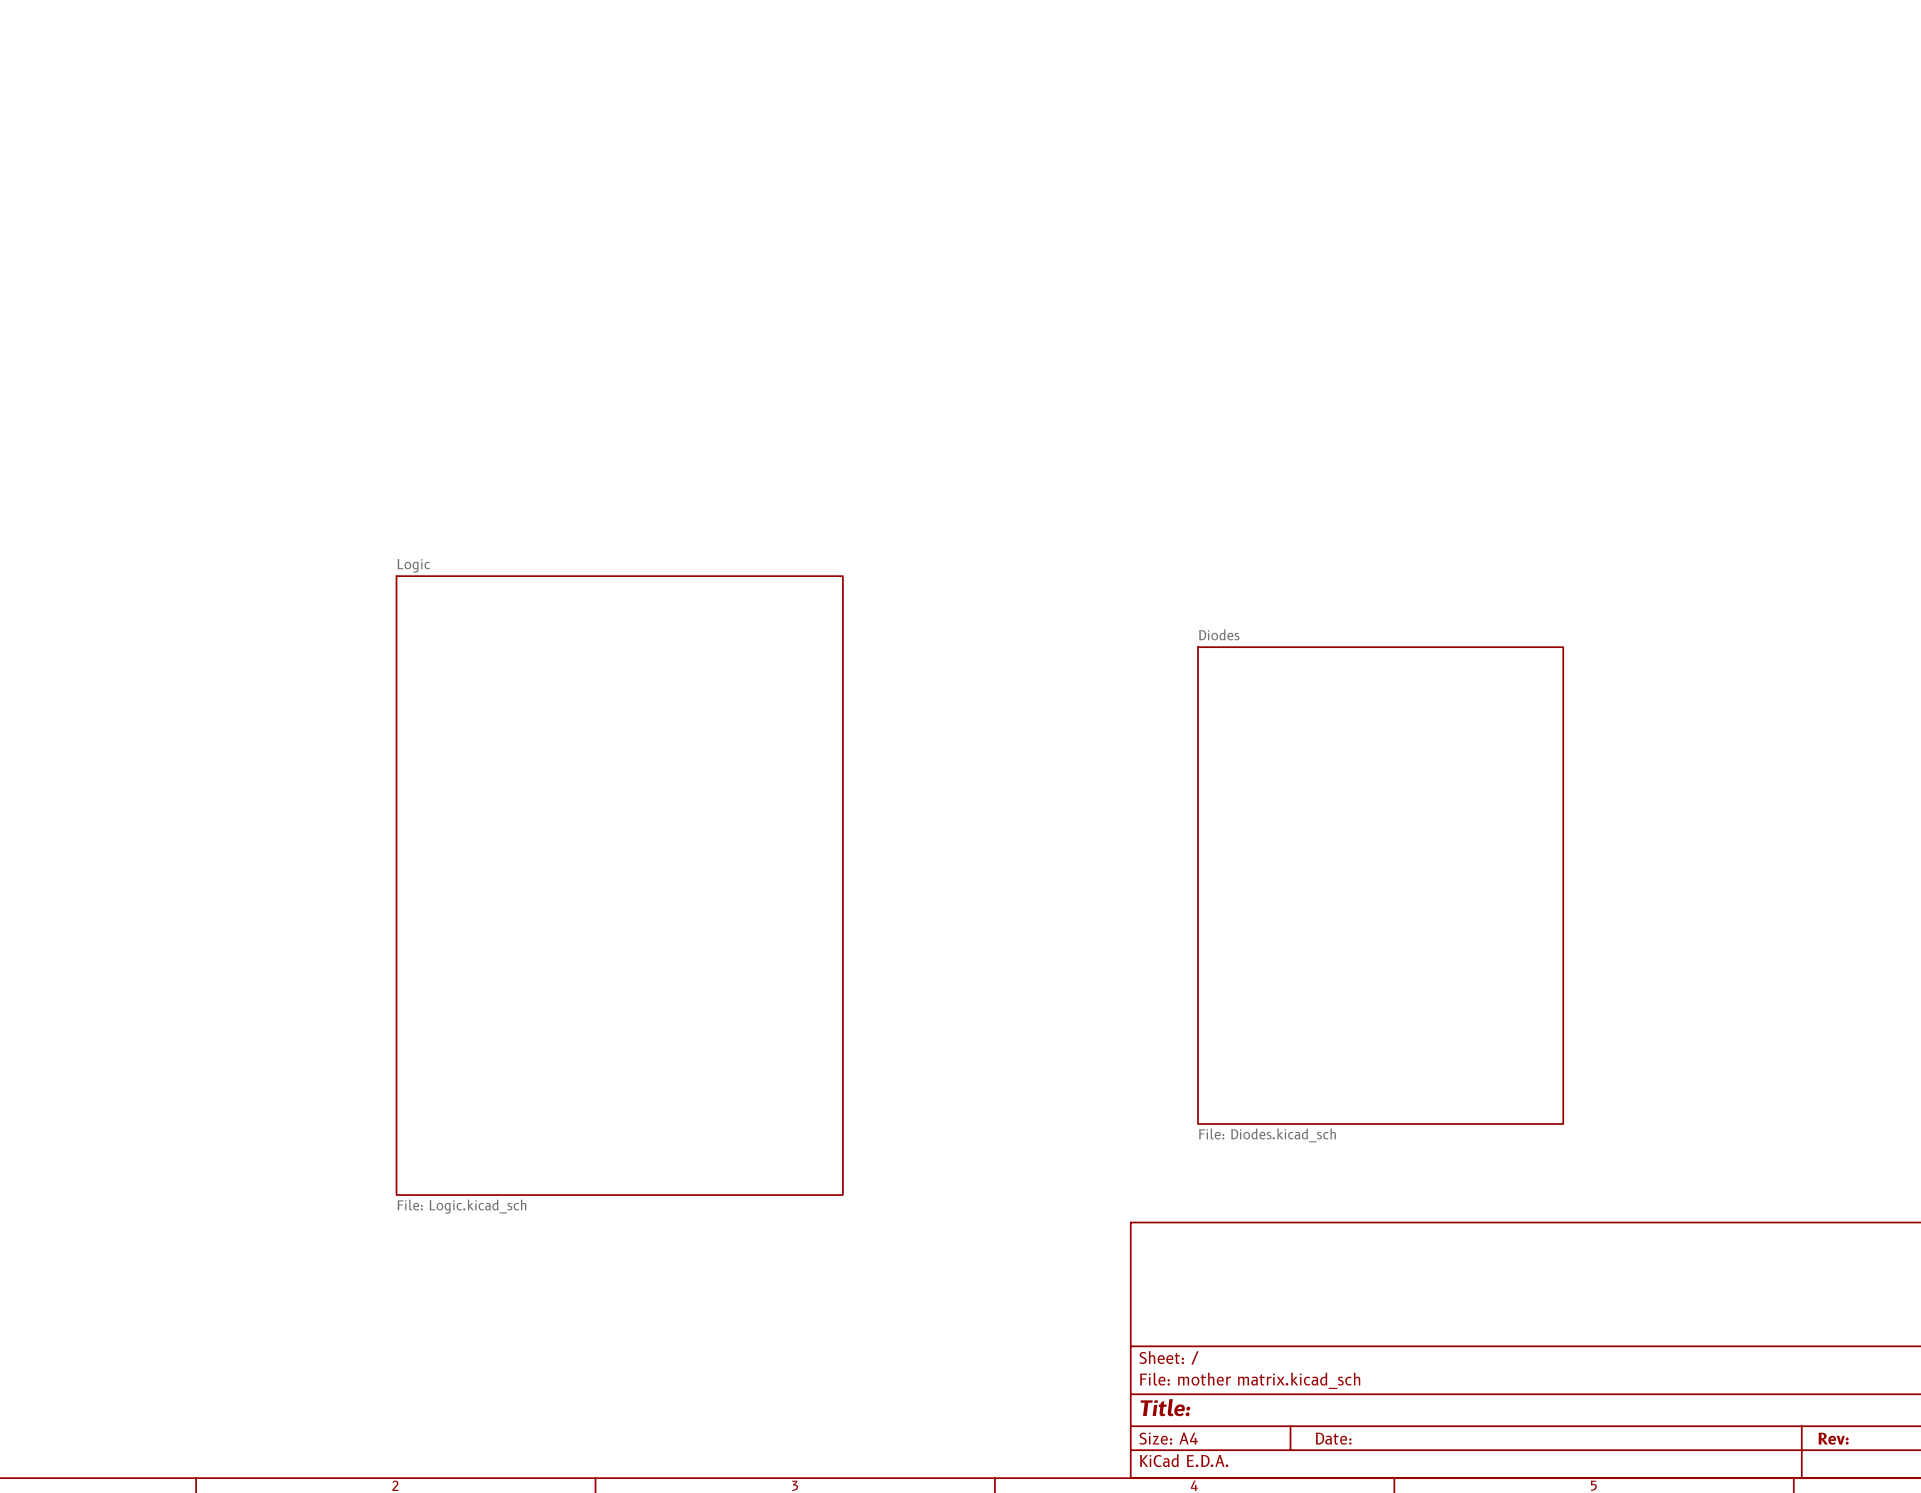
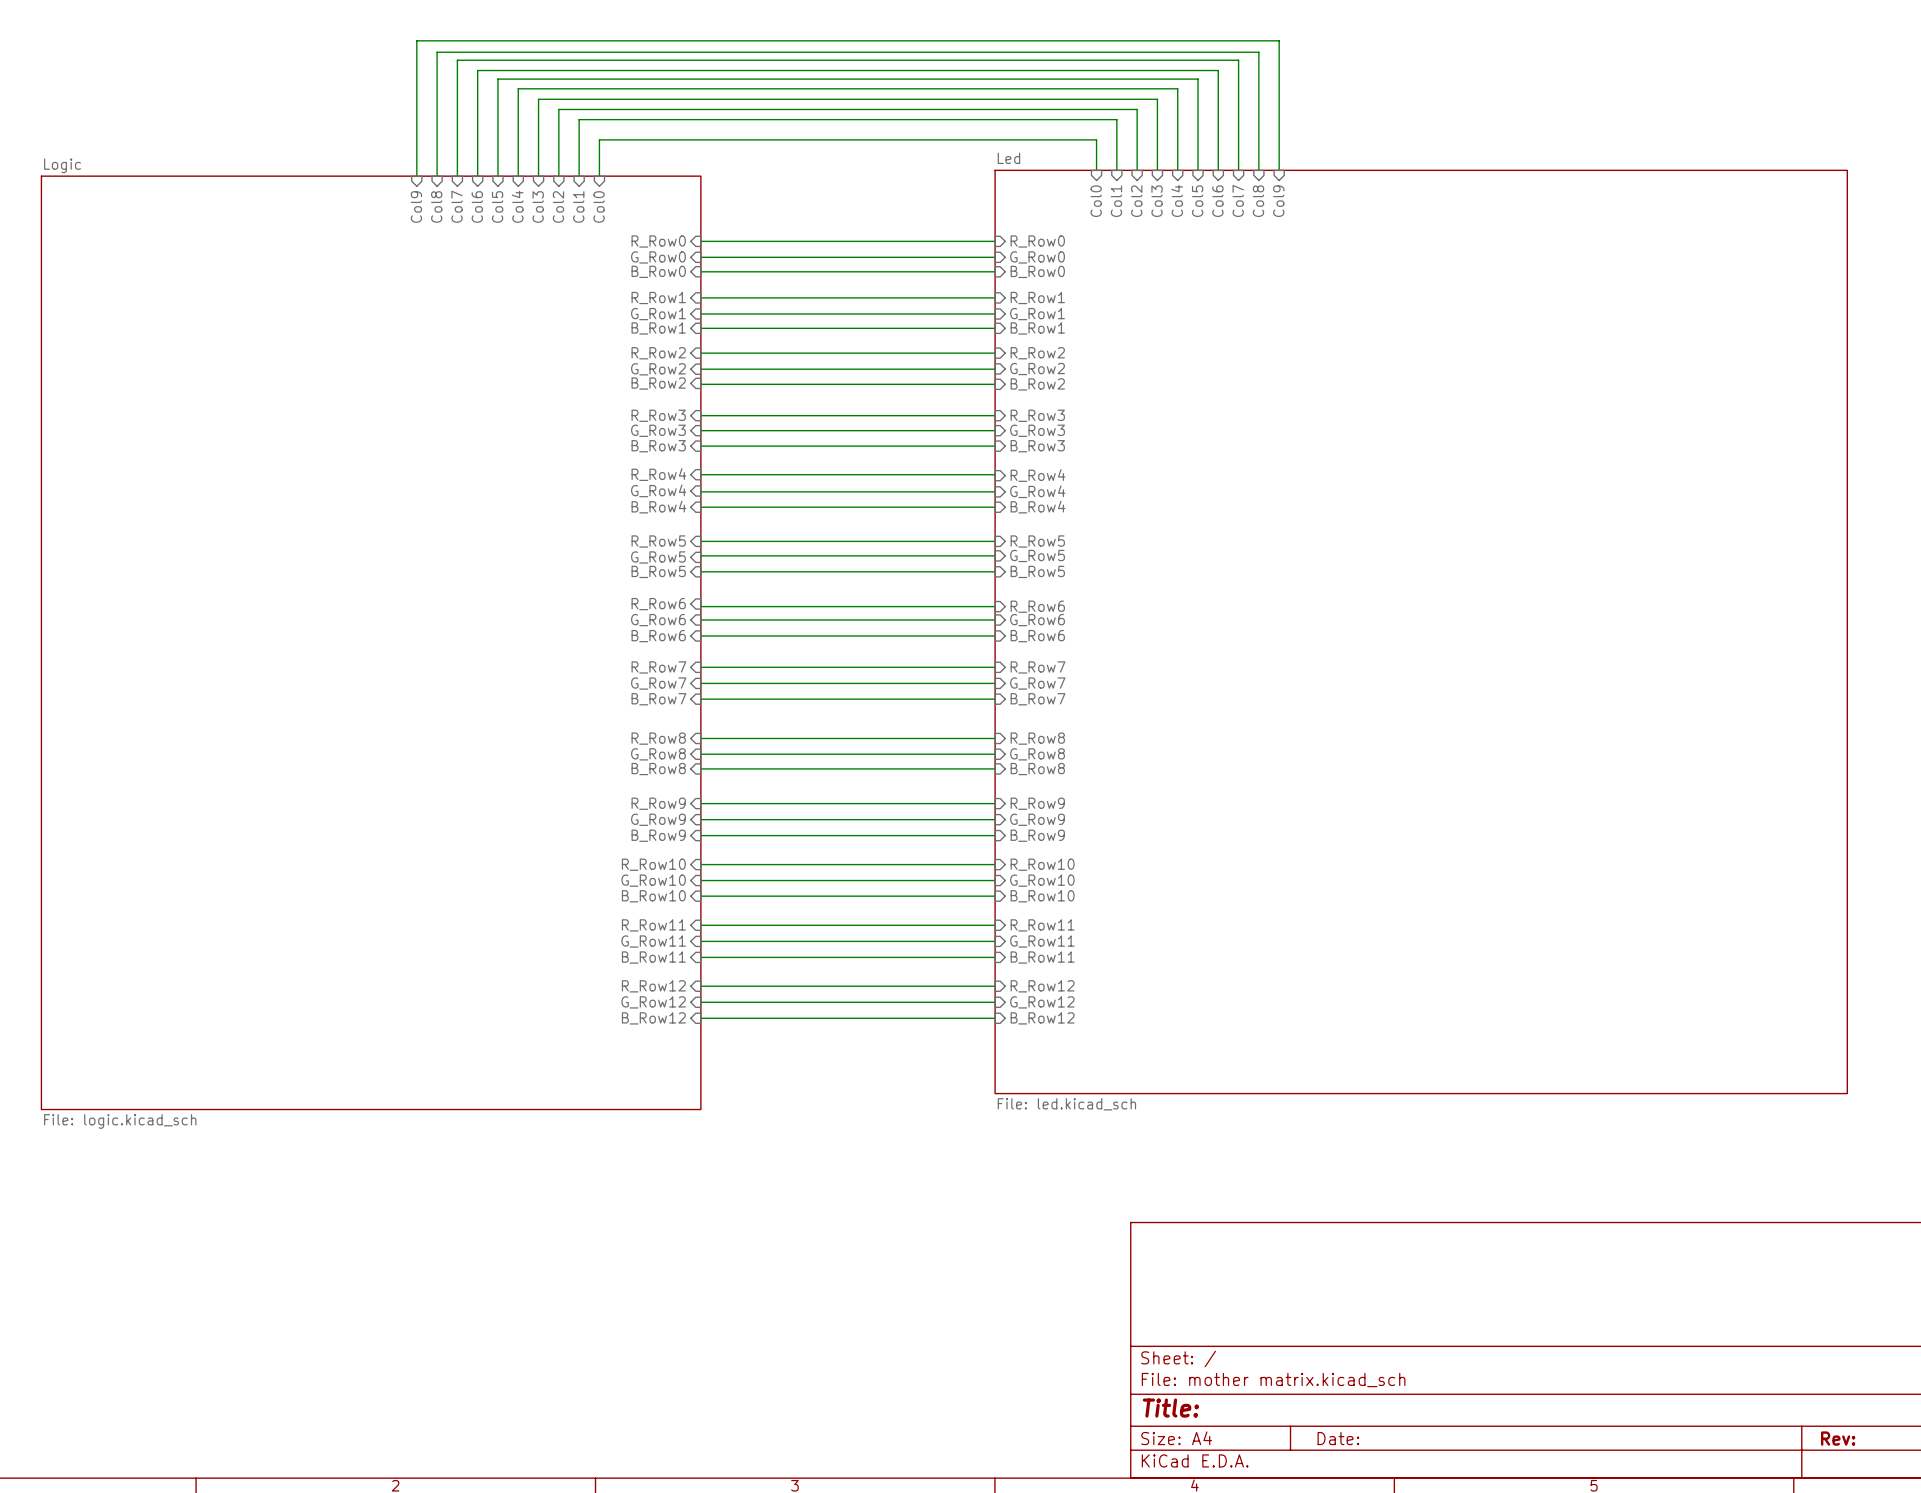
wire: none -> (1096, 170) (1096, 139) (599, 139) (599, 176)
wire: none -> (1116, 170) (1116, 119) (579, 119) (579, 176)
wire: none -> (1137, 170) (1137, 109) (558, 109) (558, 176)
wire: none -> (1157, 170) (1157, 99) (538, 99) (538, 176)
wire: none -> (1177, 170) (1177, 88) (518, 88) (518, 176)
wire: none -> (1198, 170) (1198, 79) (497, 79) (497, 176)
wire: none -> (1218, 170) (1218, 70) (477, 70) (477, 176)
wire: none -> (1238, 170) (1238, 60) (457, 60) (457, 176)
wire: none -> (1258, 170) (1258, 52) (437, 52) (437, 176)
wire: none -> (1279, 170) (1279, 40) (416, 40) (416, 176)
sheet pin: none -> Col0 (1096, 201)
sheet pin: none -> Col1 (1116, 201)
sheet pin: none -> Col2 (1136, 201)
sheet pin: none -> Col3 (1157, 201)
sheet pin: none -> Col4 (1177, 200)
sheet pin: none -> Col5 (1197, 201)
sheet pin: none -> Col6 (1217, 201)
sheet pin: none -> Col7 (1238, 200)
sheet pin: none -> Col8 (1258, 201)
sheet pin: none -> Col9 (1278, 201)
sheet pin: none -> Col8 (436, 206)
sheet pin: none -> Col9 (416, 206)
sheet pin: none -> Col7 (457, 206)
sheet pin: none -> Col6 (477, 206)
sheet pin: none -> Col5 (497, 206)
sheet pin: none -> Col4 (517, 206)
sheet pin: none -> Col3 (538, 206)
sheet pin: none -> Col2 (558, 206)
sheet pin: none -> Col1 (578, 206)
sheet pin: none -> Col0 (599, 206)
wire: none -> (700, 241) (995, 241)
sheet pin: none -> R_Row0 (658, 241)
sheet pin: none -> R_Row0 (1037, 241)
wire: none -> (700, 257) (995, 257)
sheet pin: none -> G_Row0 (658, 257)
sheet pin: none -> G_Row0 (1037, 257)
wire: none -> (700, 271) (995, 271)
sheet pin: none -> B_Row0 (658, 271)
sheet pin: none -> B_Row0 (1037, 271)
wire: none -> (700, 297) (995, 297)
sheet pin: none -> R_Row1 (658, 298)
sheet pin: none -> R_Row1 (1037, 298)
wire: none -> (700, 313) (995, 313)
sheet pin: none -> G_Row1 (658, 314)
sheet pin: none -> G_Row1 (1037, 314)
wire: none -> (700, 328) (995, 328)
sheet pin: none -> B_Row1 (658, 328)
sheet pin: none -> B_Row1 (1037, 328)
wire: none -> (700, 353) (995, 353)
sheet pin: none -> R_Row2 (658, 353)
sheet pin: none -> R_Row2 (1037, 353)
wire: none -> (995, 368) (700, 369)
sheet pin: none -> G_Row2 (658, 369)
sheet pin: none -> G_Row2 (1037, 369)
wire: none -> (700, 383) (995, 384)
sheet pin: none -> B_Row2 (658, 383)
sheet pin: none -> B_Row2 (1037, 384)
wire: none -> (700, 415) (995, 415)
sheet pin: none -> R_Row3 (658, 415)
sheet pin: none -> R_Row3 (1037, 415)
wire: none -> (700, 430) (995, 430)
sheet pin: none -> G_Row3 (658, 430)
sheet pin: none -> G_Row3 (1037, 430)
wire: none -> (700, 446) (995, 446)
sheet pin: none -> B_Row3 (658, 446)
sheet pin: none -> B_Row3 (1037, 446)
wire: none -> (700, 474) (995, 475)
sheet pin: none -> R_Row4 (658, 474)
sheet pin: none -> R_Row4 (1038, 475)
wire: none -> (700, 491) (995, 491)
sheet pin: none -> G_Row4 (658, 490)
sheet pin: none -> G_Row4 (1037, 491)
wire: none -> (700, 507) (995, 507)
sheet pin: none -> B_Row4 (658, 507)
sheet pin: none -> B_Row4 (1038, 507)
wire: none -> (700, 541) (995, 541)
sheet pin: none -> R_Row5 (658, 541)
sheet pin: none -> R_Row5 (1037, 541)
wire: none -> (995, 555) (700, 557)
sheet pin: none -> G_Row5 (1037, 555)
sheet pin: none -> G_Row5 (658, 557)
wire: none -> (700, 571) (995, 571)
sheet pin: none -> B_Row5 (658, 571)
sheet pin: none -> B_Row5 (1037, 571)
wire: none -> (700, 604) (700, 606) (995, 606)
sheet pin: none -> R_Row6 (658, 604)
sheet pin: none -> R_Row6 (1037, 606)
wire: none -> (700, 620) (995, 620)
sheet pin: none -> G_Row6 (658, 620)
sheet pin: none -> G_Row6 (1037, 620)
sheet Led: none -> File: led.kicad_sch (1421, 631)
wire: none -> (700, 636) (995, 636)
sheet pin: none -> B_Row6 (658, 636)
sheet pin: none -> B_Row6 (1037, 636)
sheet Logic: none -> File: logic.kicad_sch (371, 642)
wire: none -> (700, 667) (995, 667)
sheet pin: none -> R_Row7 (658, 667)
sheet pin: none -> R_Row7 (1038, 667)
wire: none -> (700, 683) (995, 683)
sheet pin: none -> G_Row7 (658, 683)
sheet pin: none -> G_Row7 (1037, 683)
wire: none -> (700, 699) (995, 699)
sheet pin: none -> B_Row7 (658, 699)
sheet pin: none -> B_Row7 (1038, 699)
wire: none -> (700, 738) (995, 738)
sheet pin: none -> R_Row8 (658, 738)
sheet pin: none -> R_Row8 (1037, 738)
wire: none -> (700, 754) (995, 754)
sheet pin: none -> G_Row8 (658, 754)
sheet pin: none -> G_Row8 (1037, 754)
wire: none -> (700, 768) (995, 768)
sheet pin: none -> B_Row8 (658, 769)
sheet pin: none -> B_Row8 (1037, 769)
wire: none -> (700, 803) (995, 803)
sheet pin: none -> R_Row9 (658, 803)
sheet pin: none -> R_Row9 (1037, 803)
wire: none -> (700, 819) (995, 819)
sheet pin: none -> G_Row9 (658, 819)
sheet pin: none -> G_Row9 (1037, 819)
wire: none -> (700, 835) (995, 835)
sheet pin: none -> B_Row9 (658, 835)
sheet pin: none -> B_Row9 (1037, 835)
wire: none -> (700, 864) (995, 864)
sheet pin: none -> R_Row10 (653, 864)
sheet pin: none -> R_Row10 (1042, 864)
wire: none -> (700, 880) (995, 880)
sheet pin: none -> G_Row10 (653, 880)
sheet pin: none -> G_Row10 (1042, 880)
sheet Logic: File: Logic.kicad_sch (619, 885) -> none
sheet Diodes: File: Diodes.kicad_sch (1380, 885) -> none
wire: none -> (700, 896) (995, 896)
sheet pin: none -> B_Row10 (653, 896)
sheet pin: none -> B_Row10 (1042, 896)
wire: none -> (700, 925) (995, 925)
sheet pin: none -> R_Row11 (653, 925)
sheet pin: none -> R_Row11 (1042, 925)
wire: none -> (700, 941) (995, 941)
sheet pin: none -> G_Row11 (653, 941)
sheet pin: none -> G_Row11 (1042, 941)
wire: none -> (700, 957) (995, 957)
sheet pin: none -> B_Row11 (653, 957)
sheet pin: none -> B_Row11 (1042, 957)
wire: none -> (700, 986) (995, 986)
sheet pin: none -> R_Row12 (653, 986)
sheet pin: none -> R_Row12 (1042, 986)
wire: none -> (700, 1002) (995, 1002)
sheet pin: none -> G_Row12 (653, 1002)
sheet pin: none -> G_Row12 (1042, 1002)
wire: none -> (700, 1018) (995, 1018)
sheet pin: none -> B_Row12 (653, 1018)
sheet pin: none -> B_Row12 (1042, 1018)

